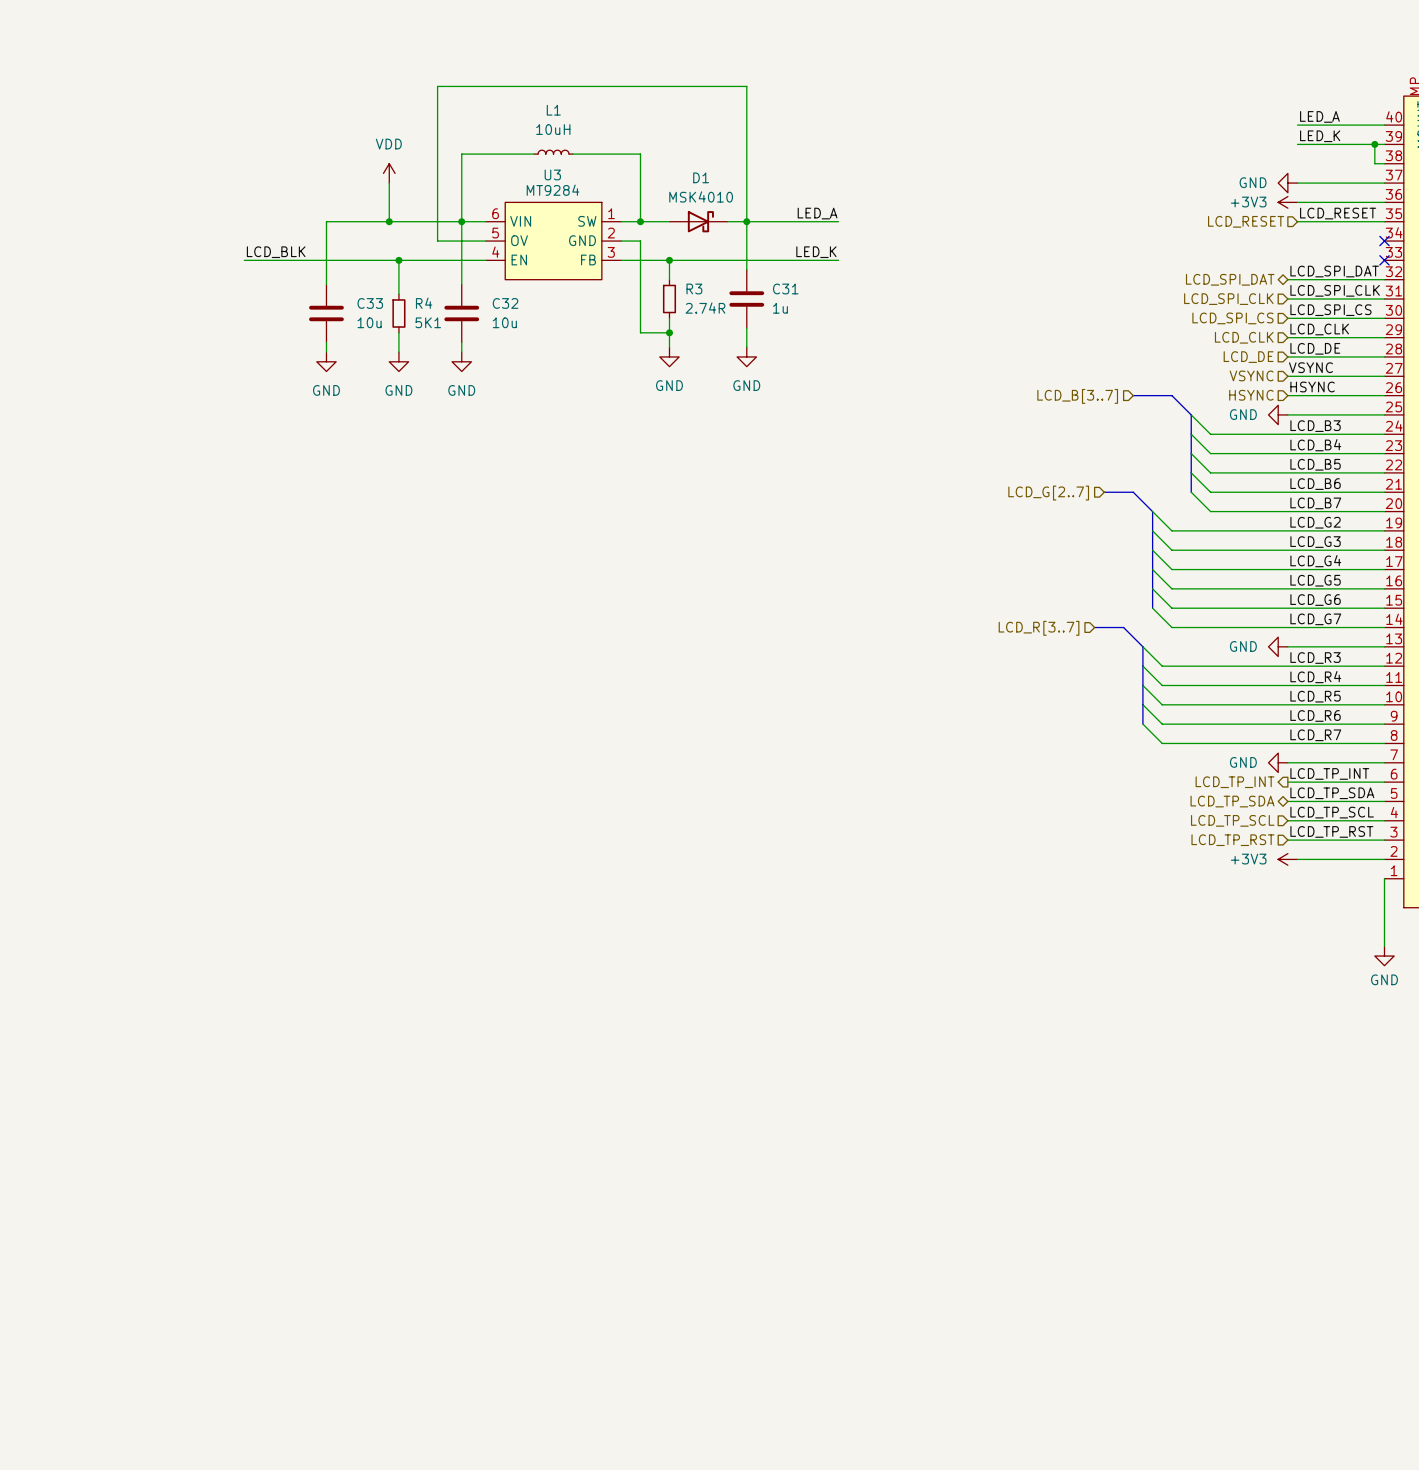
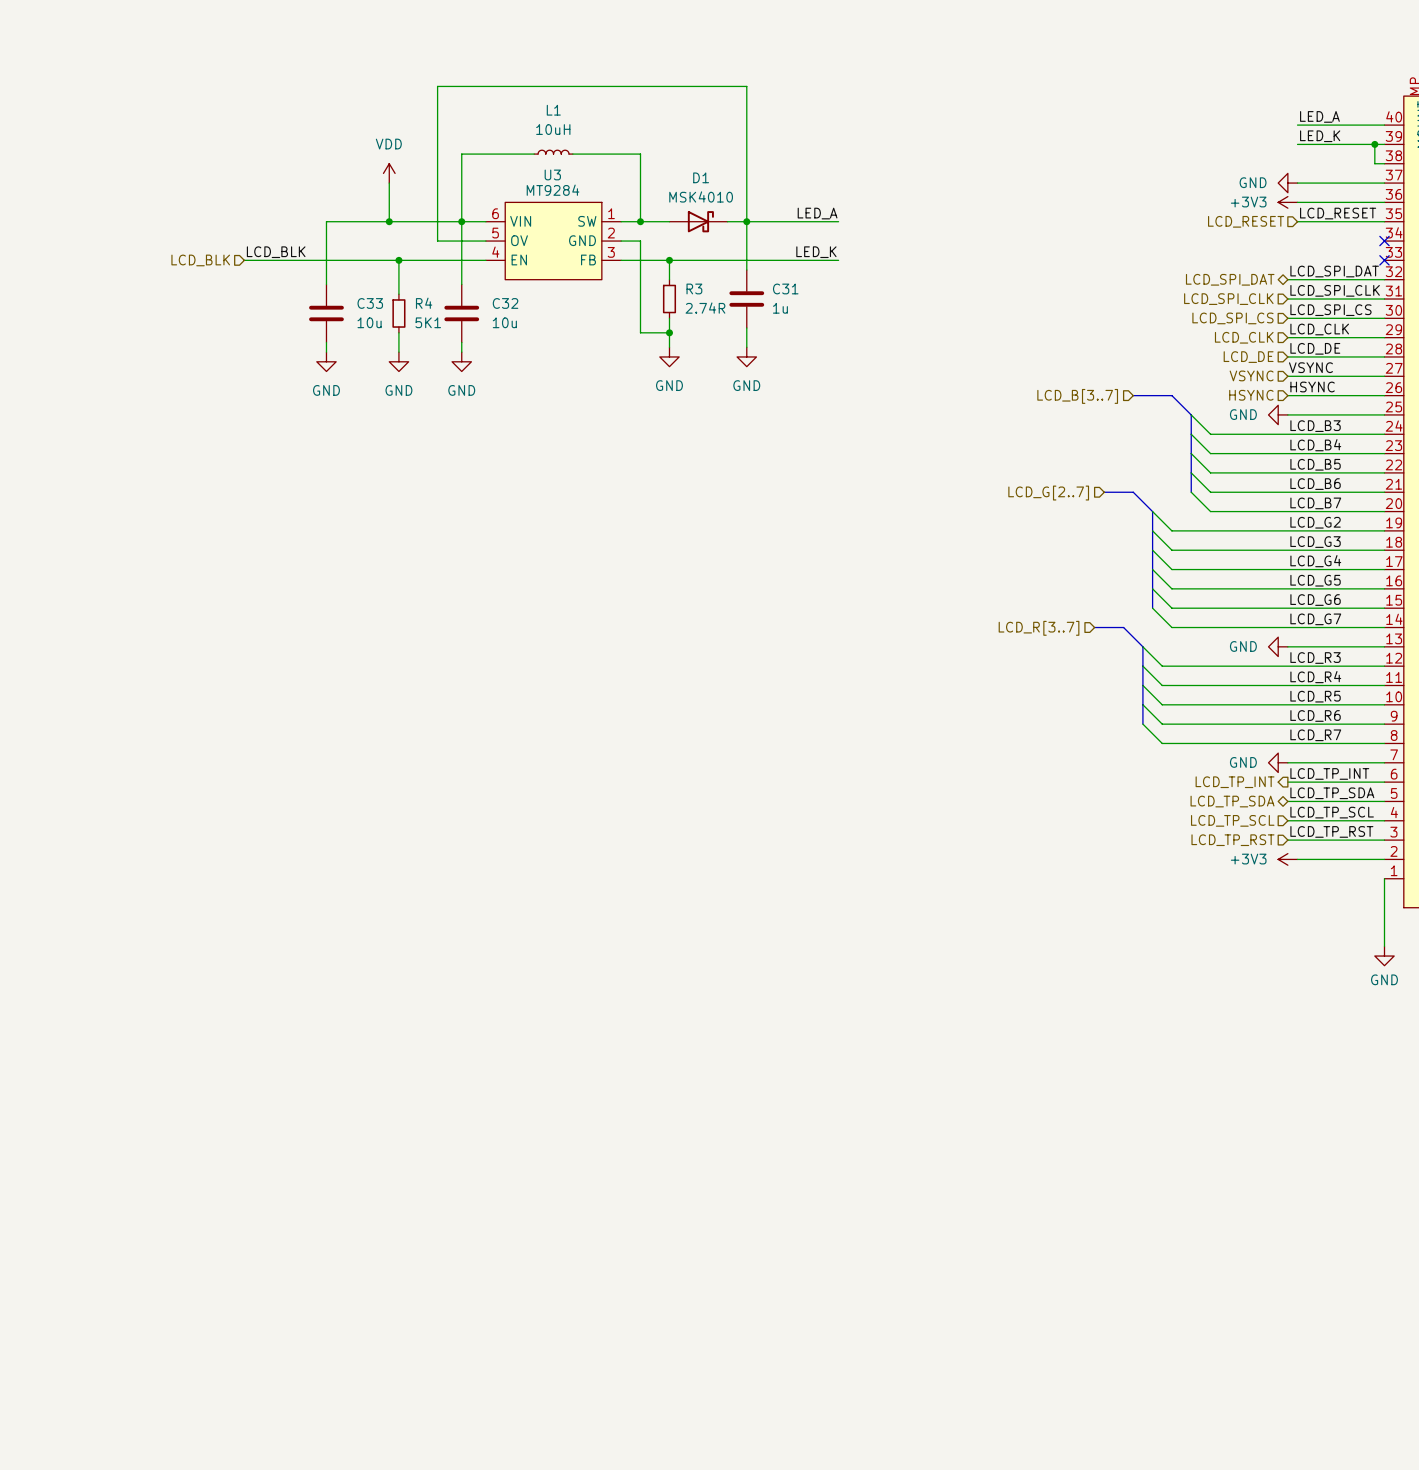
hierarchical label: none -> LCD_BLK (200, 260)

